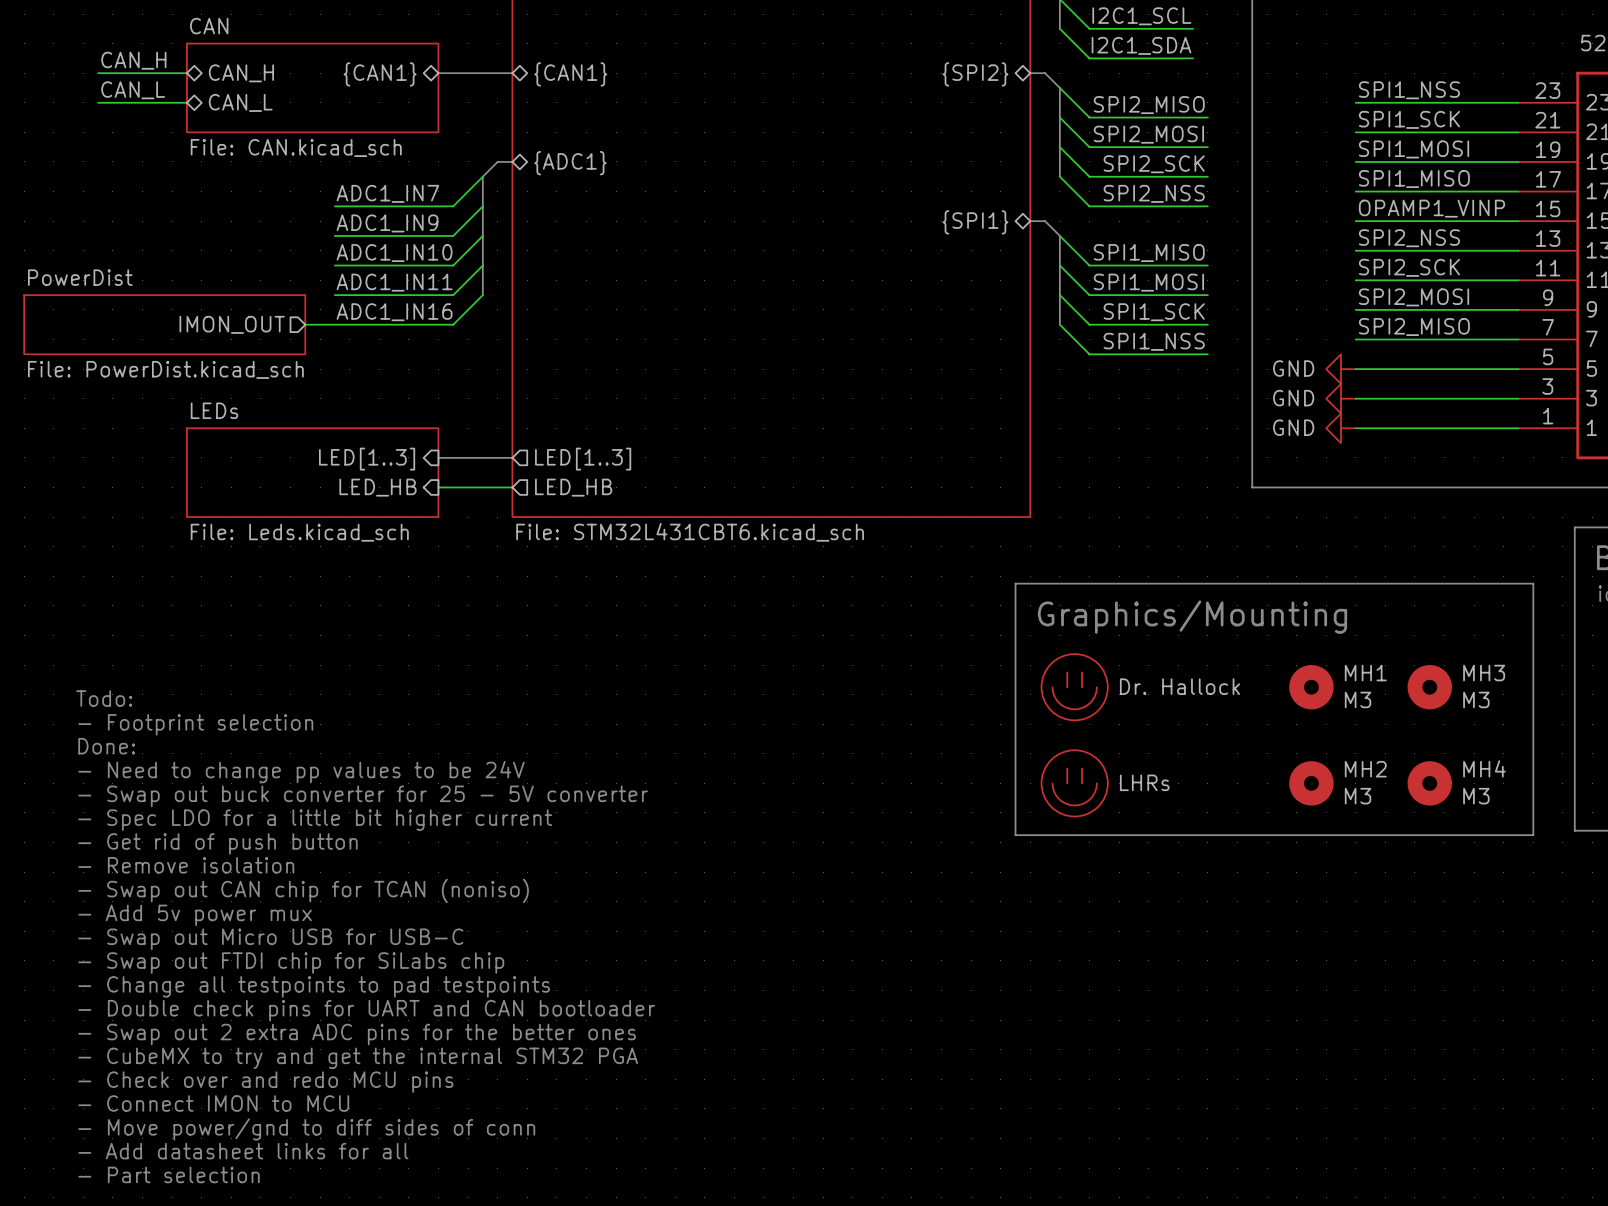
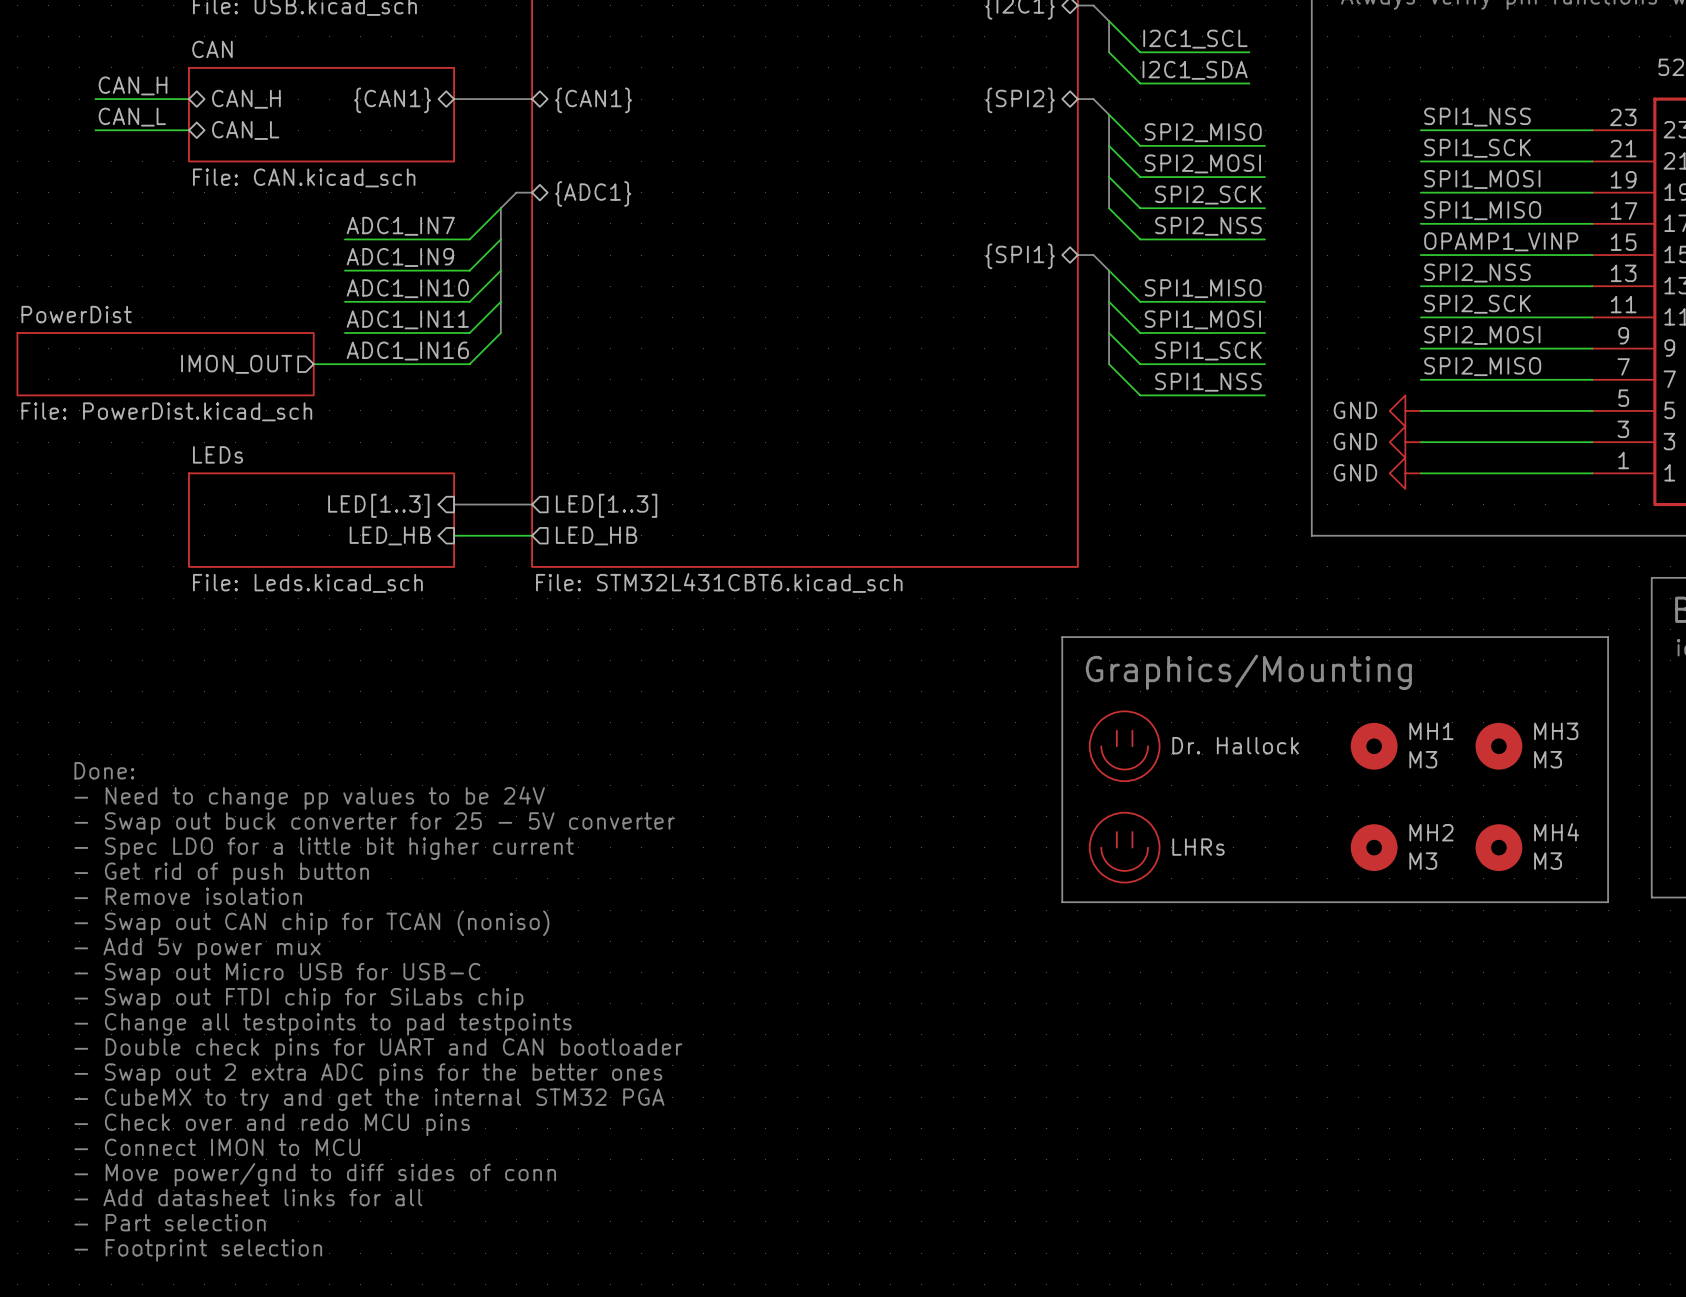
text: Todo: (104, 698) -> none
text: - Footprint selection (195, 724) -> none
text position: Done: (106, 746) -> Done: (104, 770)
text position: - Need to change pp values to be 24V (301, 772) -> - Need to change pp values to be 24V (309, 798)
text position: - Swap out buck converter for 25 - 5V converter (363, 796) -> - Swap out buck converter for 25 - 5V converter (374, 823)
text position: - Spec LDO for a little bit higher current (315, 820) -> - Spec LDO for a little bit higher current (324, 848)
text position: - Get rid of push button (217, 843) -> - Get rid of push button (221, 873)
text position: - Remove isolation (186, 865) -> - Remove isolation (188, 896)
text position: - Swap out CAN chip for TCAN (noniso) (303, 890) -> - Swap out CAN chip for TCAN (noniso) (311, 923)
text position: - Add 5v power mux (195, 915) -> - Add 5v power mux (197, 949)
text position: - Swap out Micro USB for USB-C (270, 939) -> - Swap out Micro USB for USB-C (277, 974)
text position: - Swap out FTDI chip for SiLabs chip (291, 963) -> - Swap out FTDI chip for SiLabs chip (298, 999)
text position: - Change all testpoints to pad testpoints (314, 986) -> - Change all testpoints to pad testpoints (323, 1024)
text position: - Double check pins for UART and CAN bootloader (366, 1010) -> - Double check pins for UART and CAN bootloader (378, 1049)
text position: - Swap out 2 extra ADC pins for the better ones (357, 1034) -> - Swap out 2 extra ADC pins for the better ones (368, 1074)
text position: - CubeMX to try and get the internal STM32 PGA (358, 1058) -> - CubeMX to try and get the internal STM32 PGA (369, 1099)
text position: - Check over and redo MCU pins (265, 1082) -> - Check over and redo MCU pins (272, 1124)
text position: - Connect IMON to MCU (213, 1103) -> - Connect IMON to MCU (217, 1147)
text position: - Move power/gnd to diff sides of conn (306, 1129) -> - Move power/gnd to diff sides of conn (315, 1174)
text position: - Add datasheet links for all (243, 1151) -> - Add datasheet links for all (248, 1197)
text: none -> - Footprint selection (198, 1250)
text position: - Part selection (169, 1174) -> - Part selection (170, 1222)

